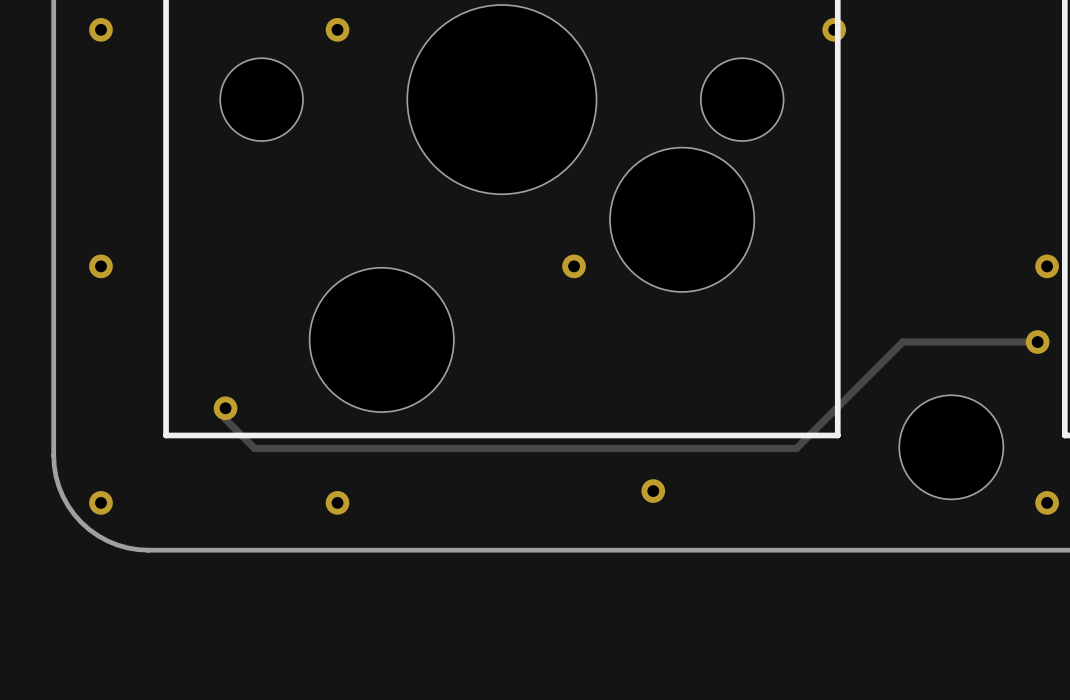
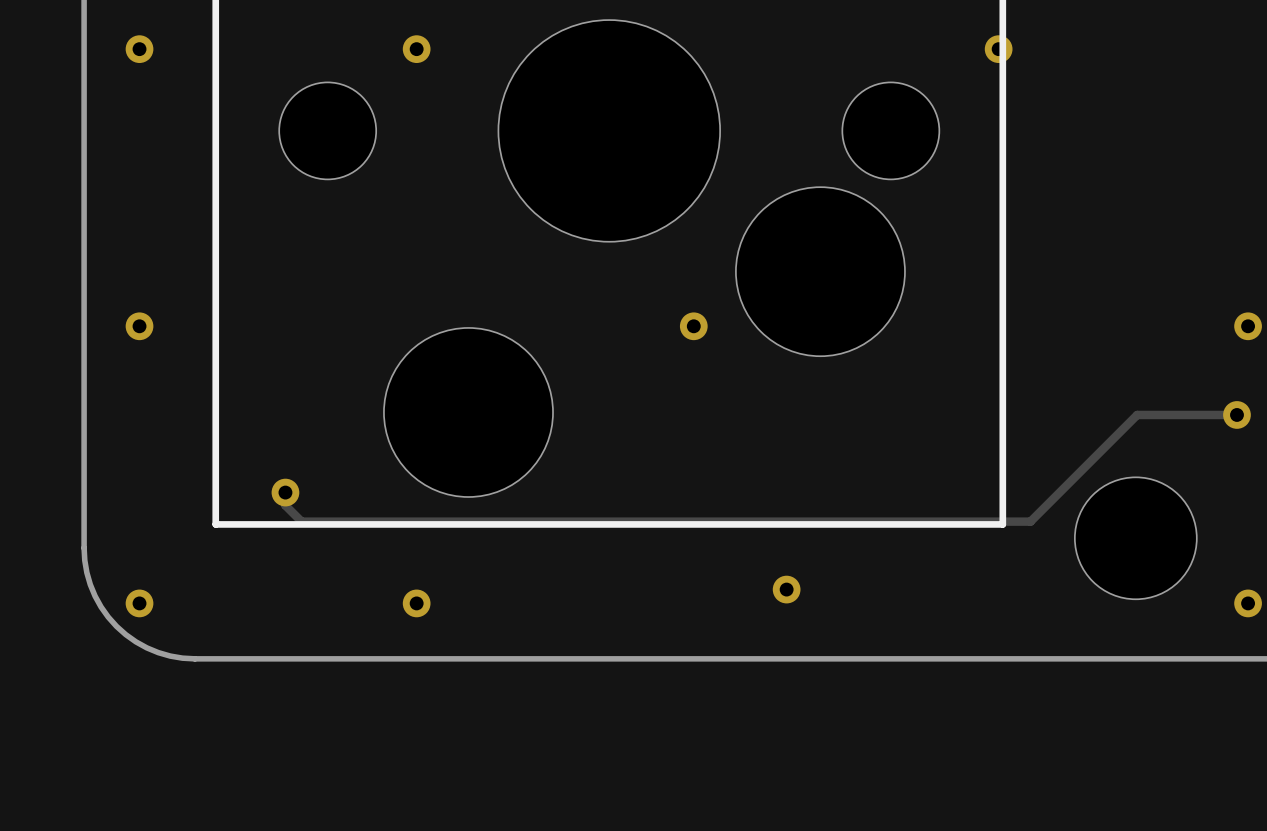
track: (952, 342) (902, 342) (796, 448) (254, 448) (239, 433) -> (1137, 414) (1030, 521) (301, 521)

